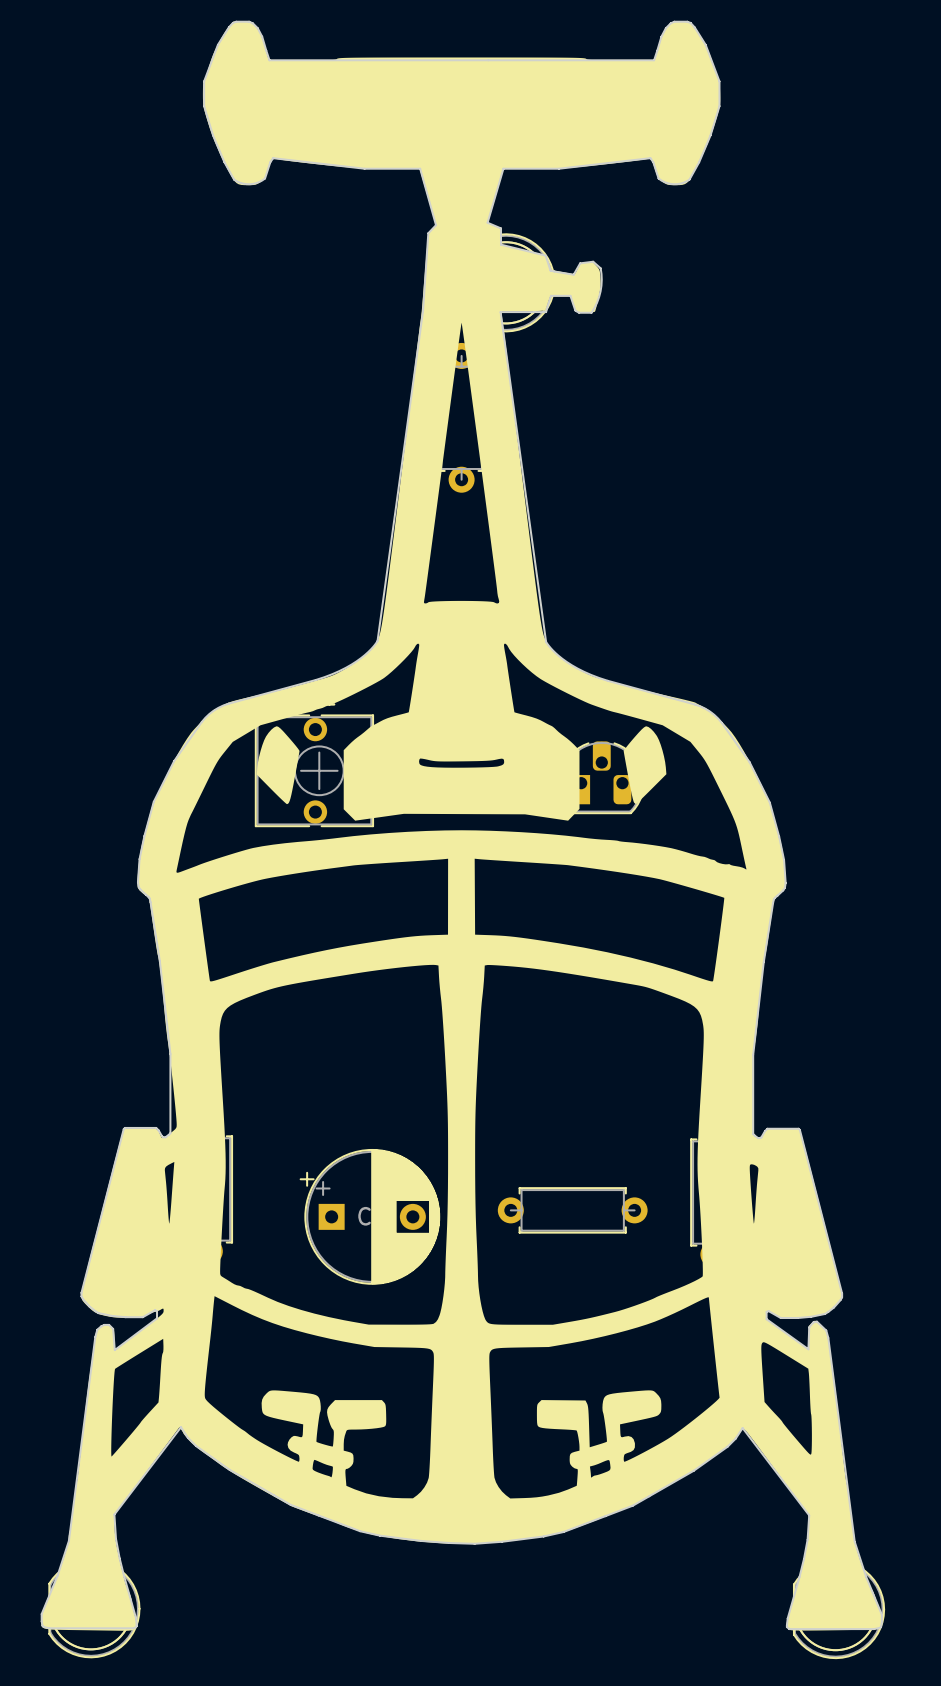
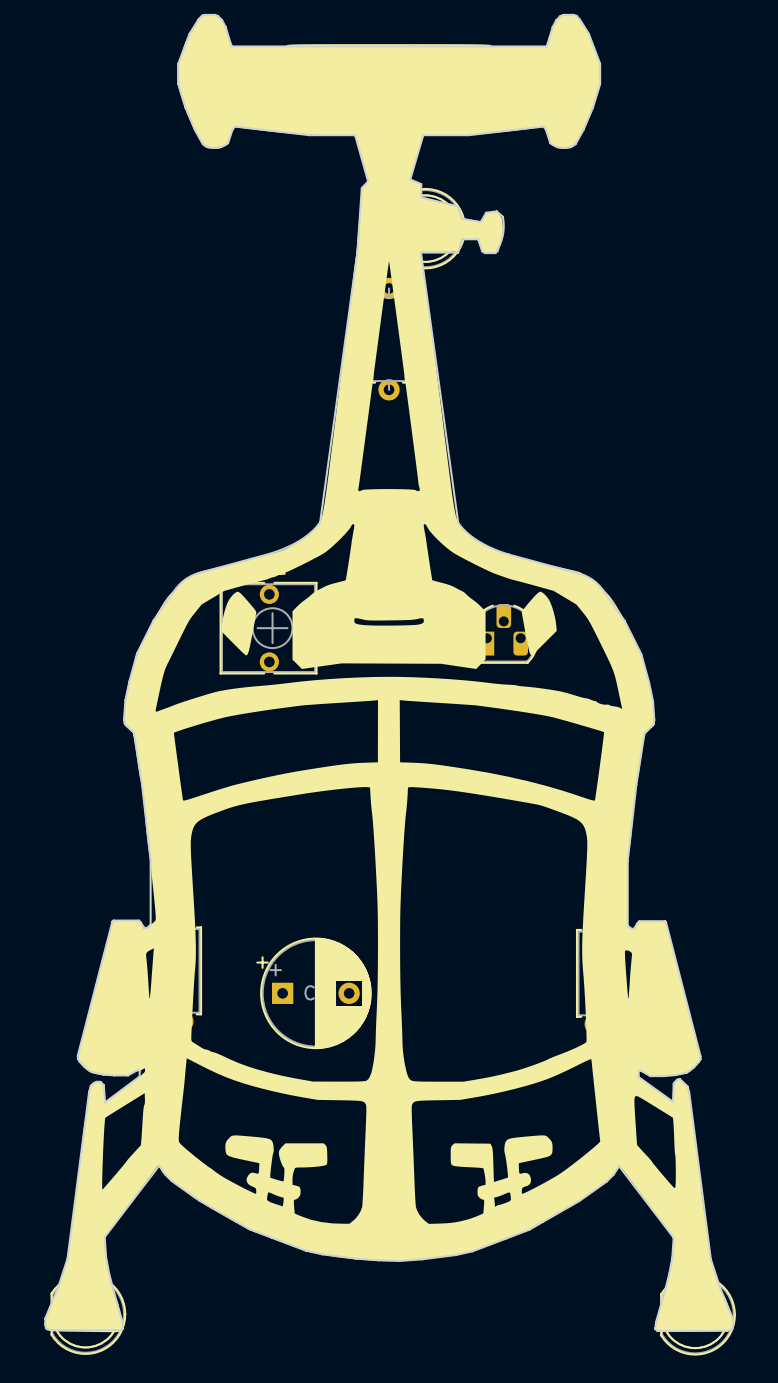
part: (572, 1210) -> none

